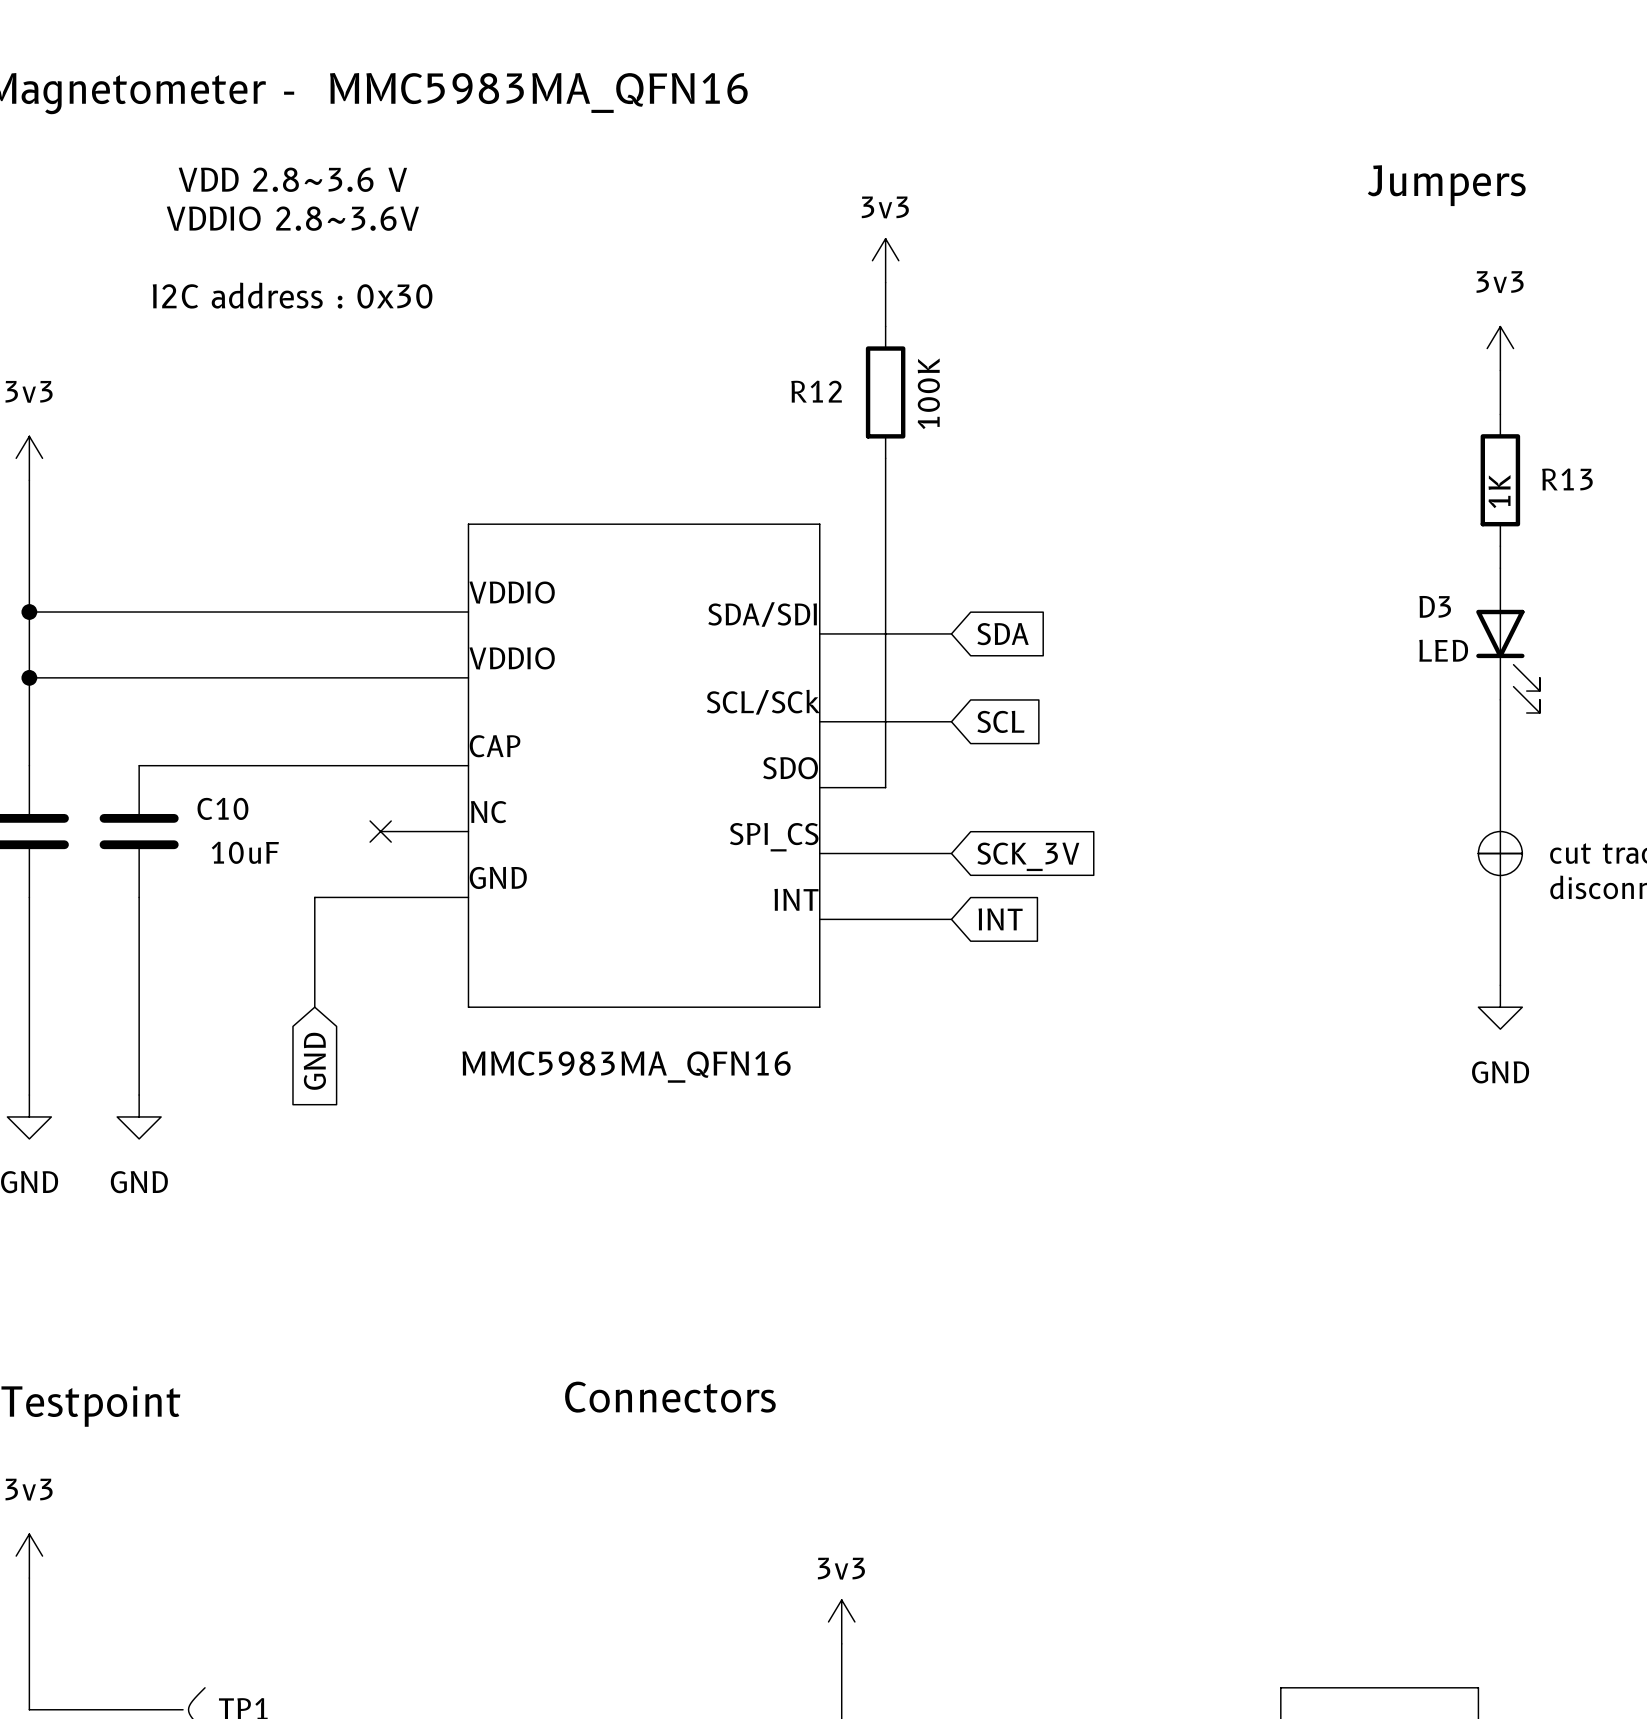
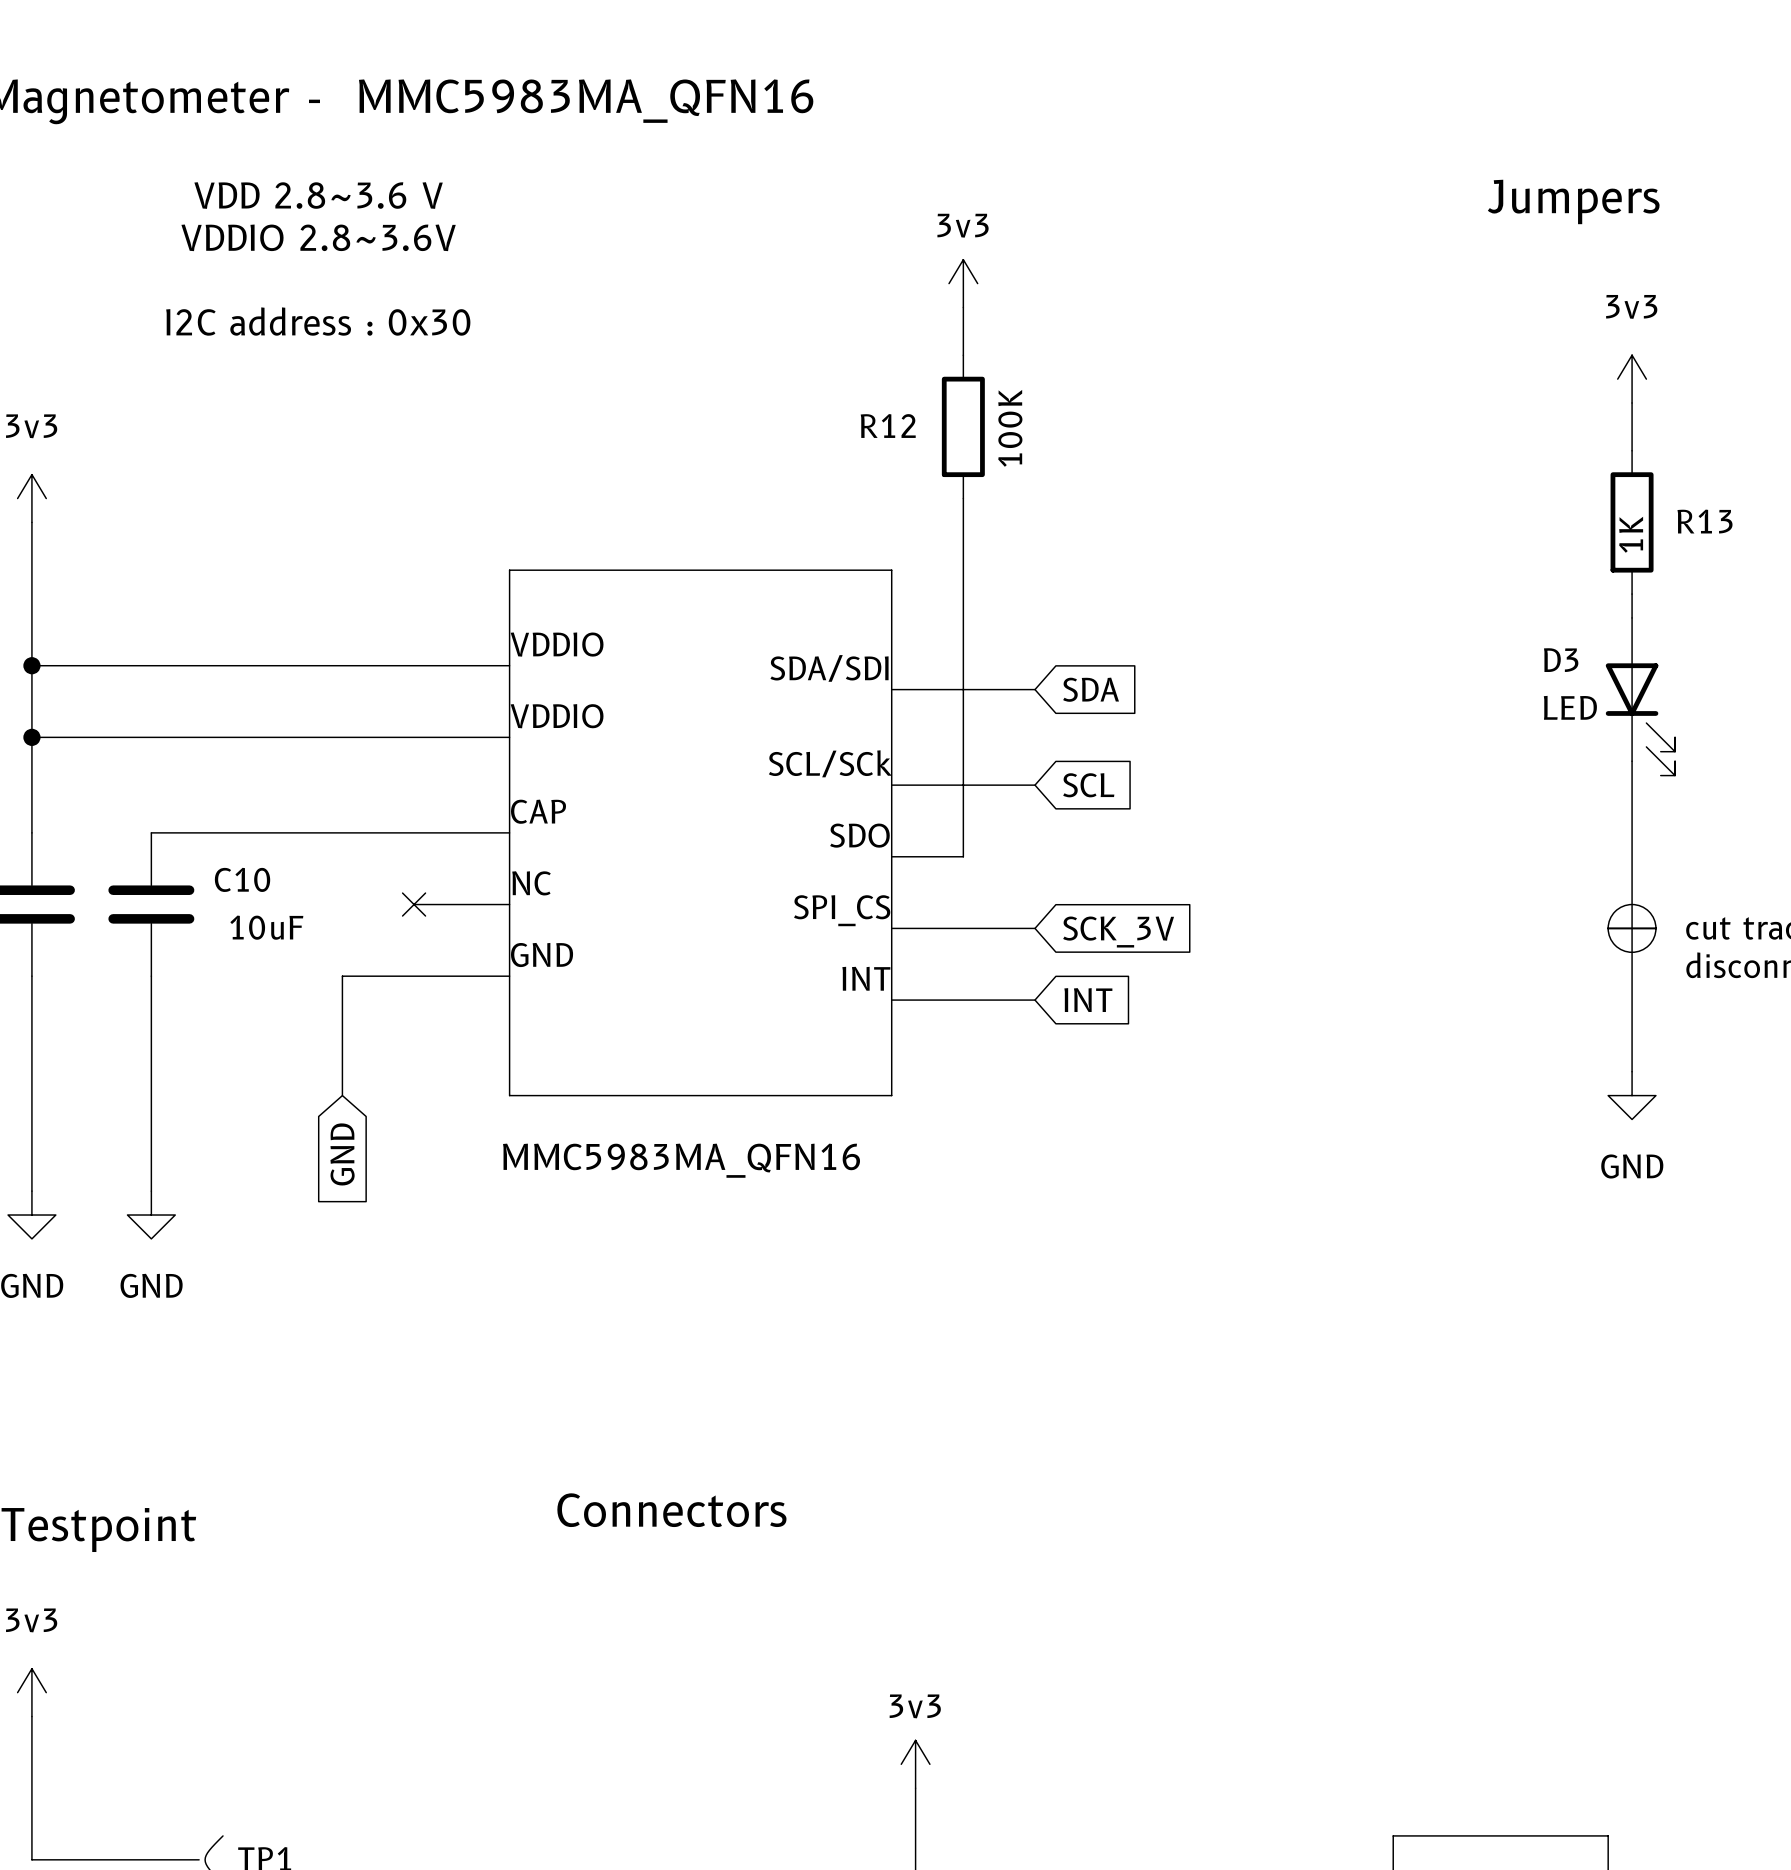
text position: Connectors (670, 1397) -> Connectors (671, 1510)

